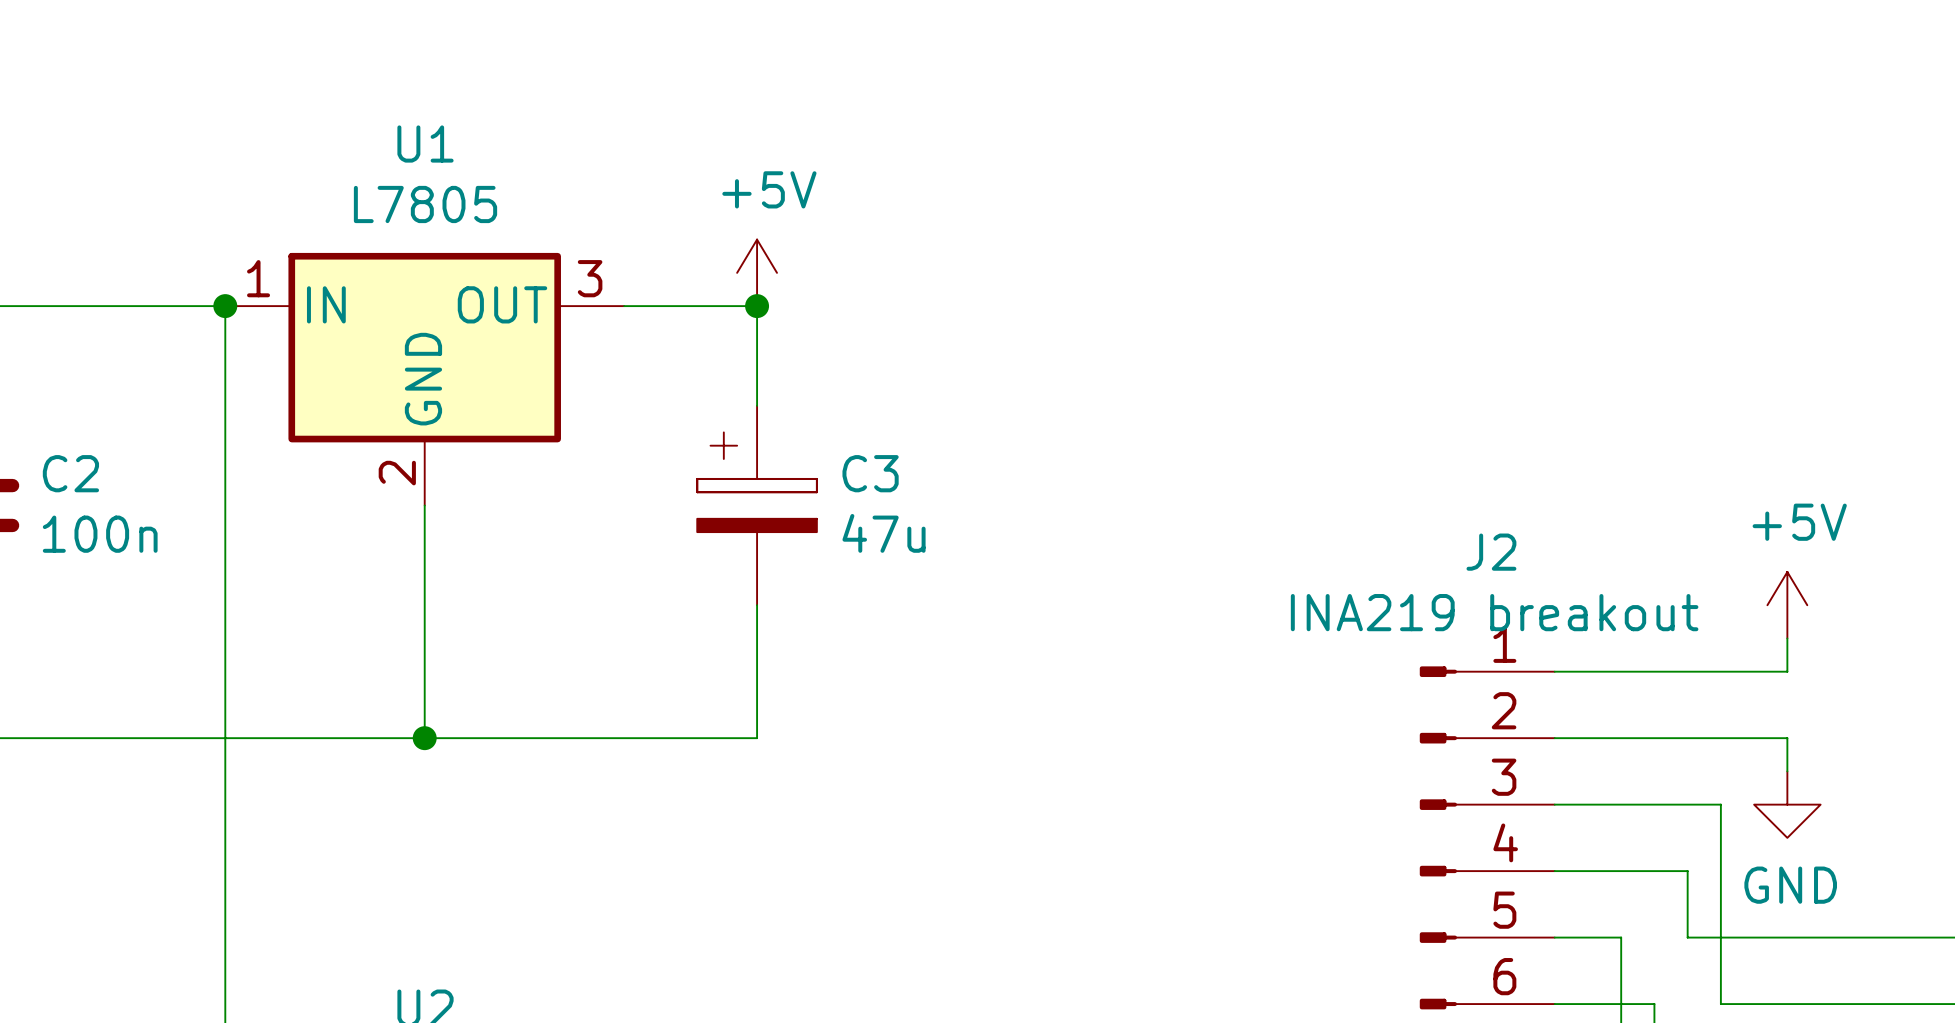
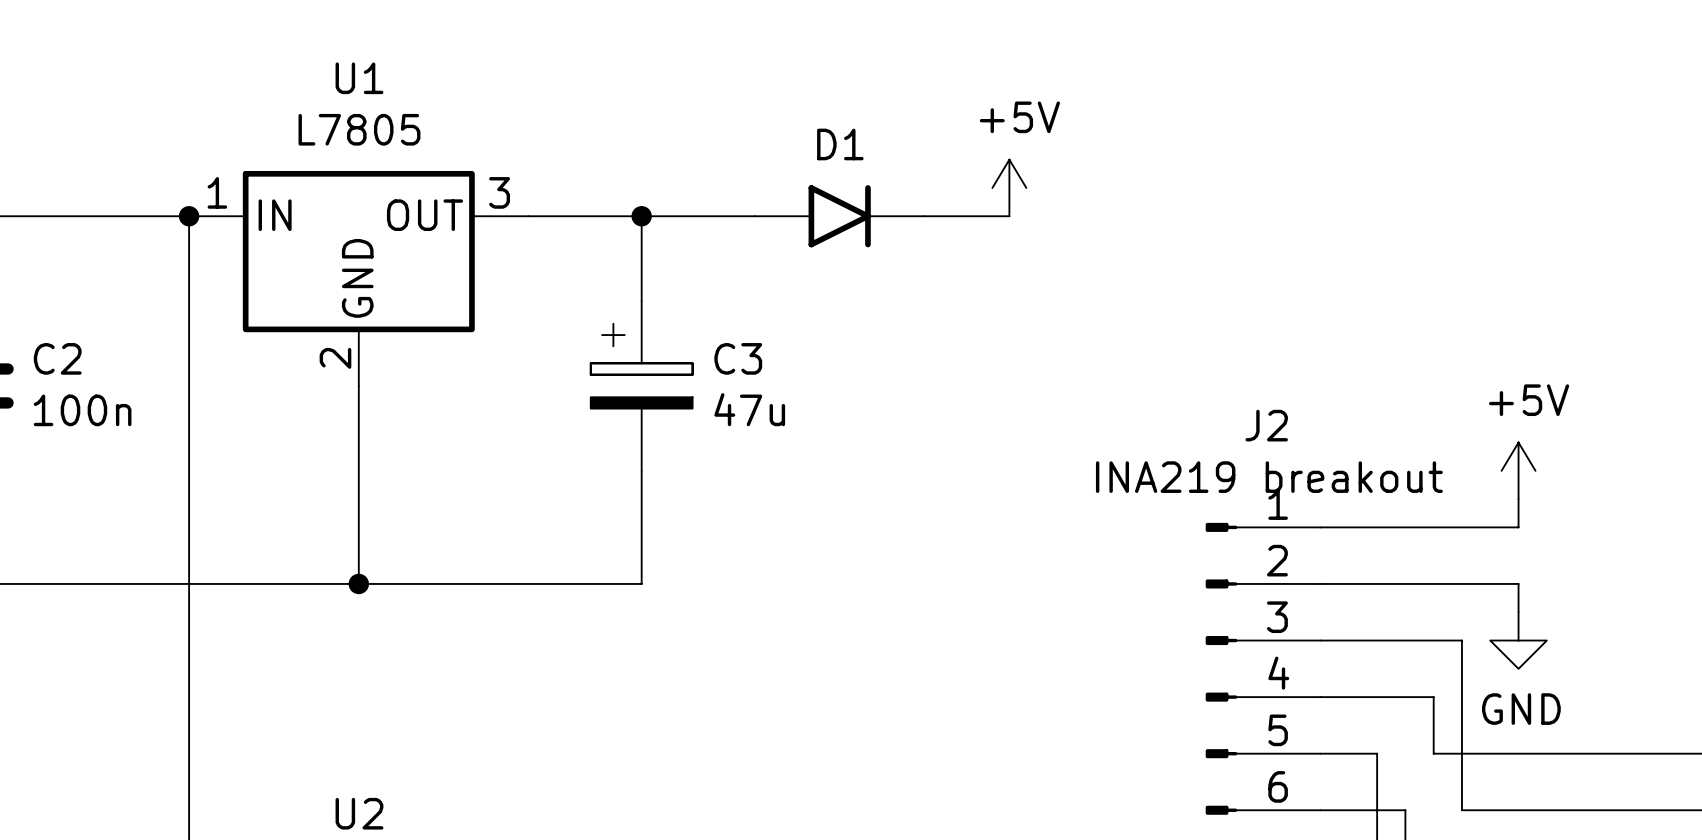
power symbol position: +5V (757, 272) -> +5V (1009, 187)
wire: none -> (641, 216) (754, 216)
D1: none -> (839, 216)
wire: none -> (924, 216) (1009, 216)

